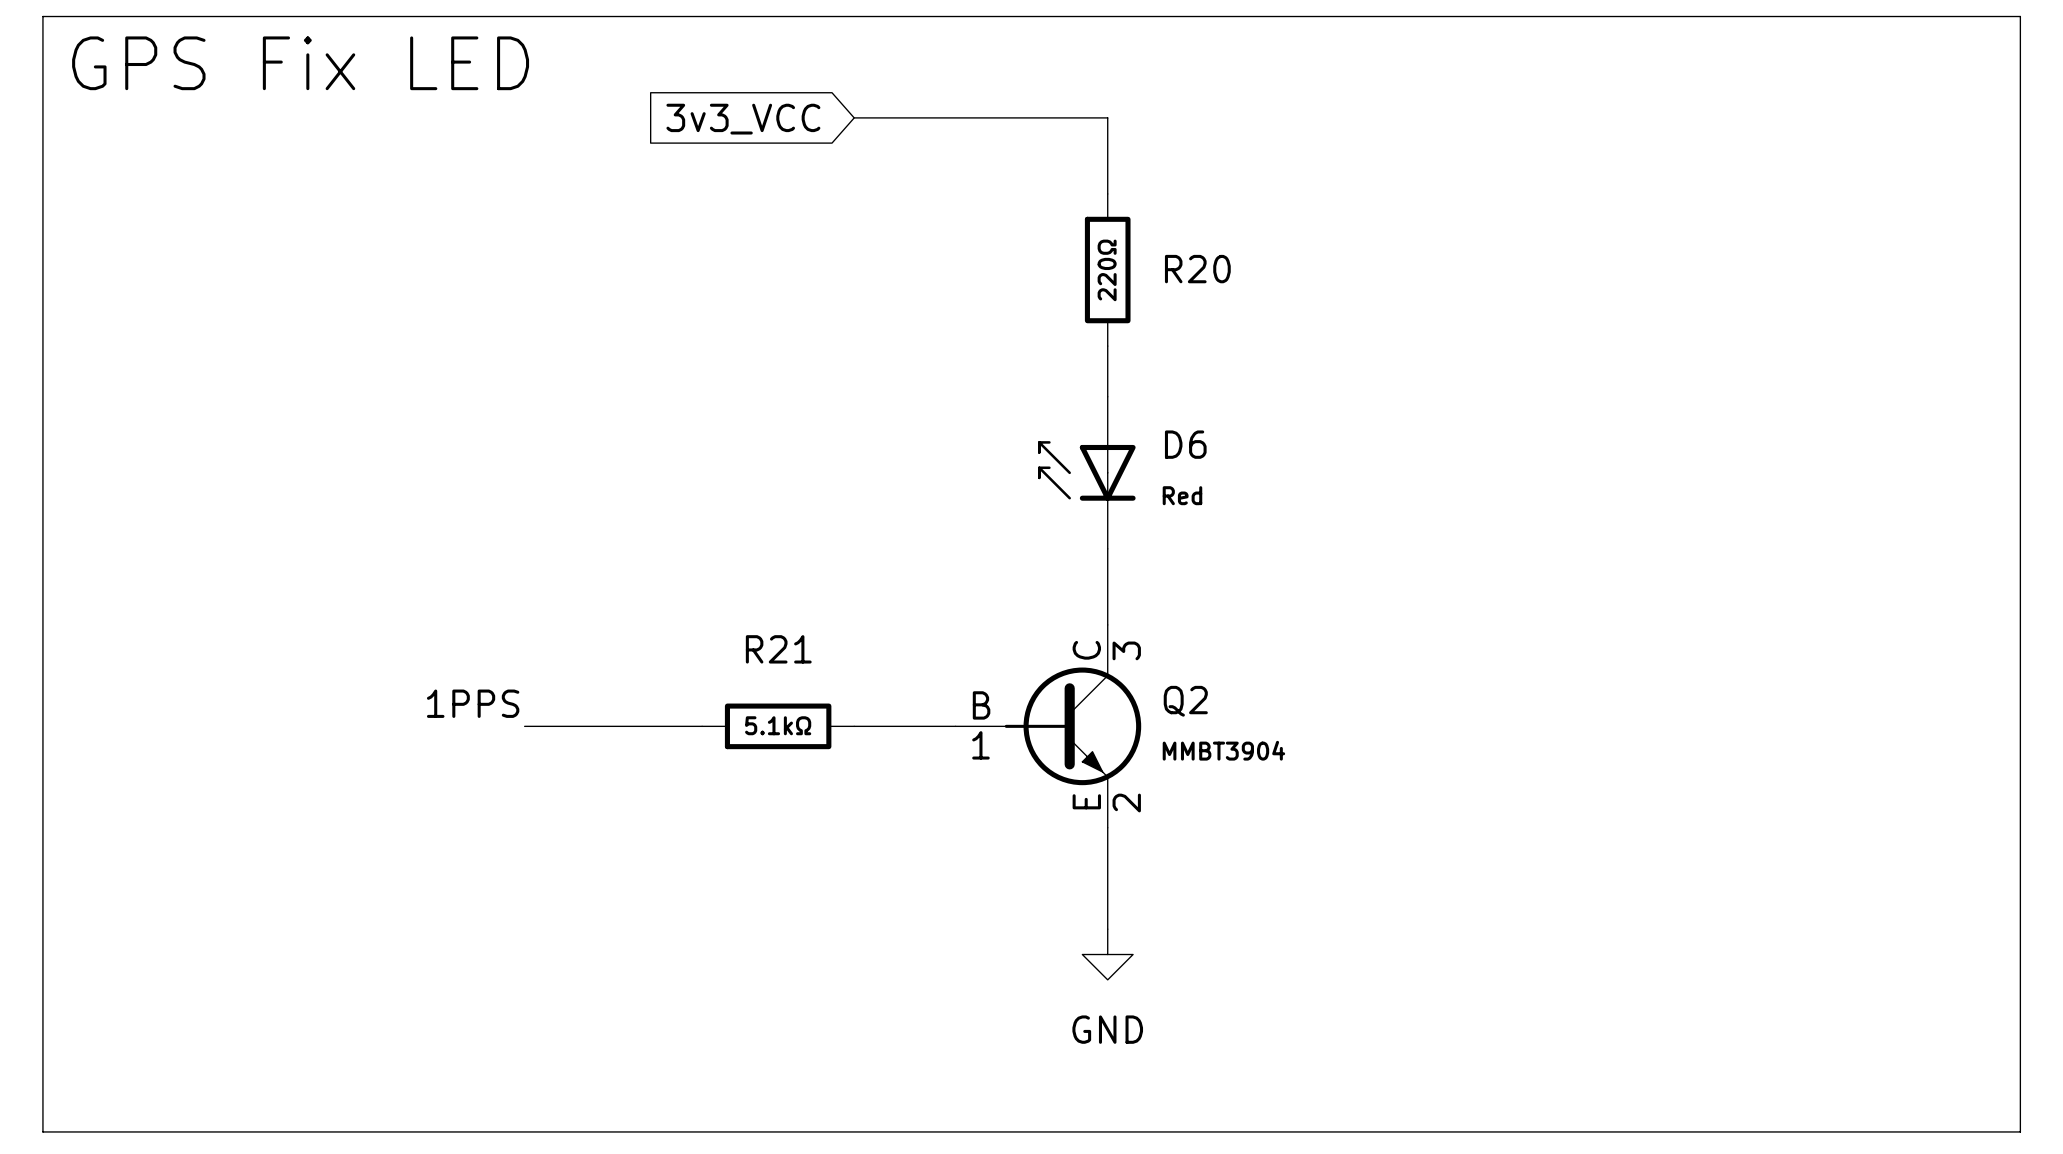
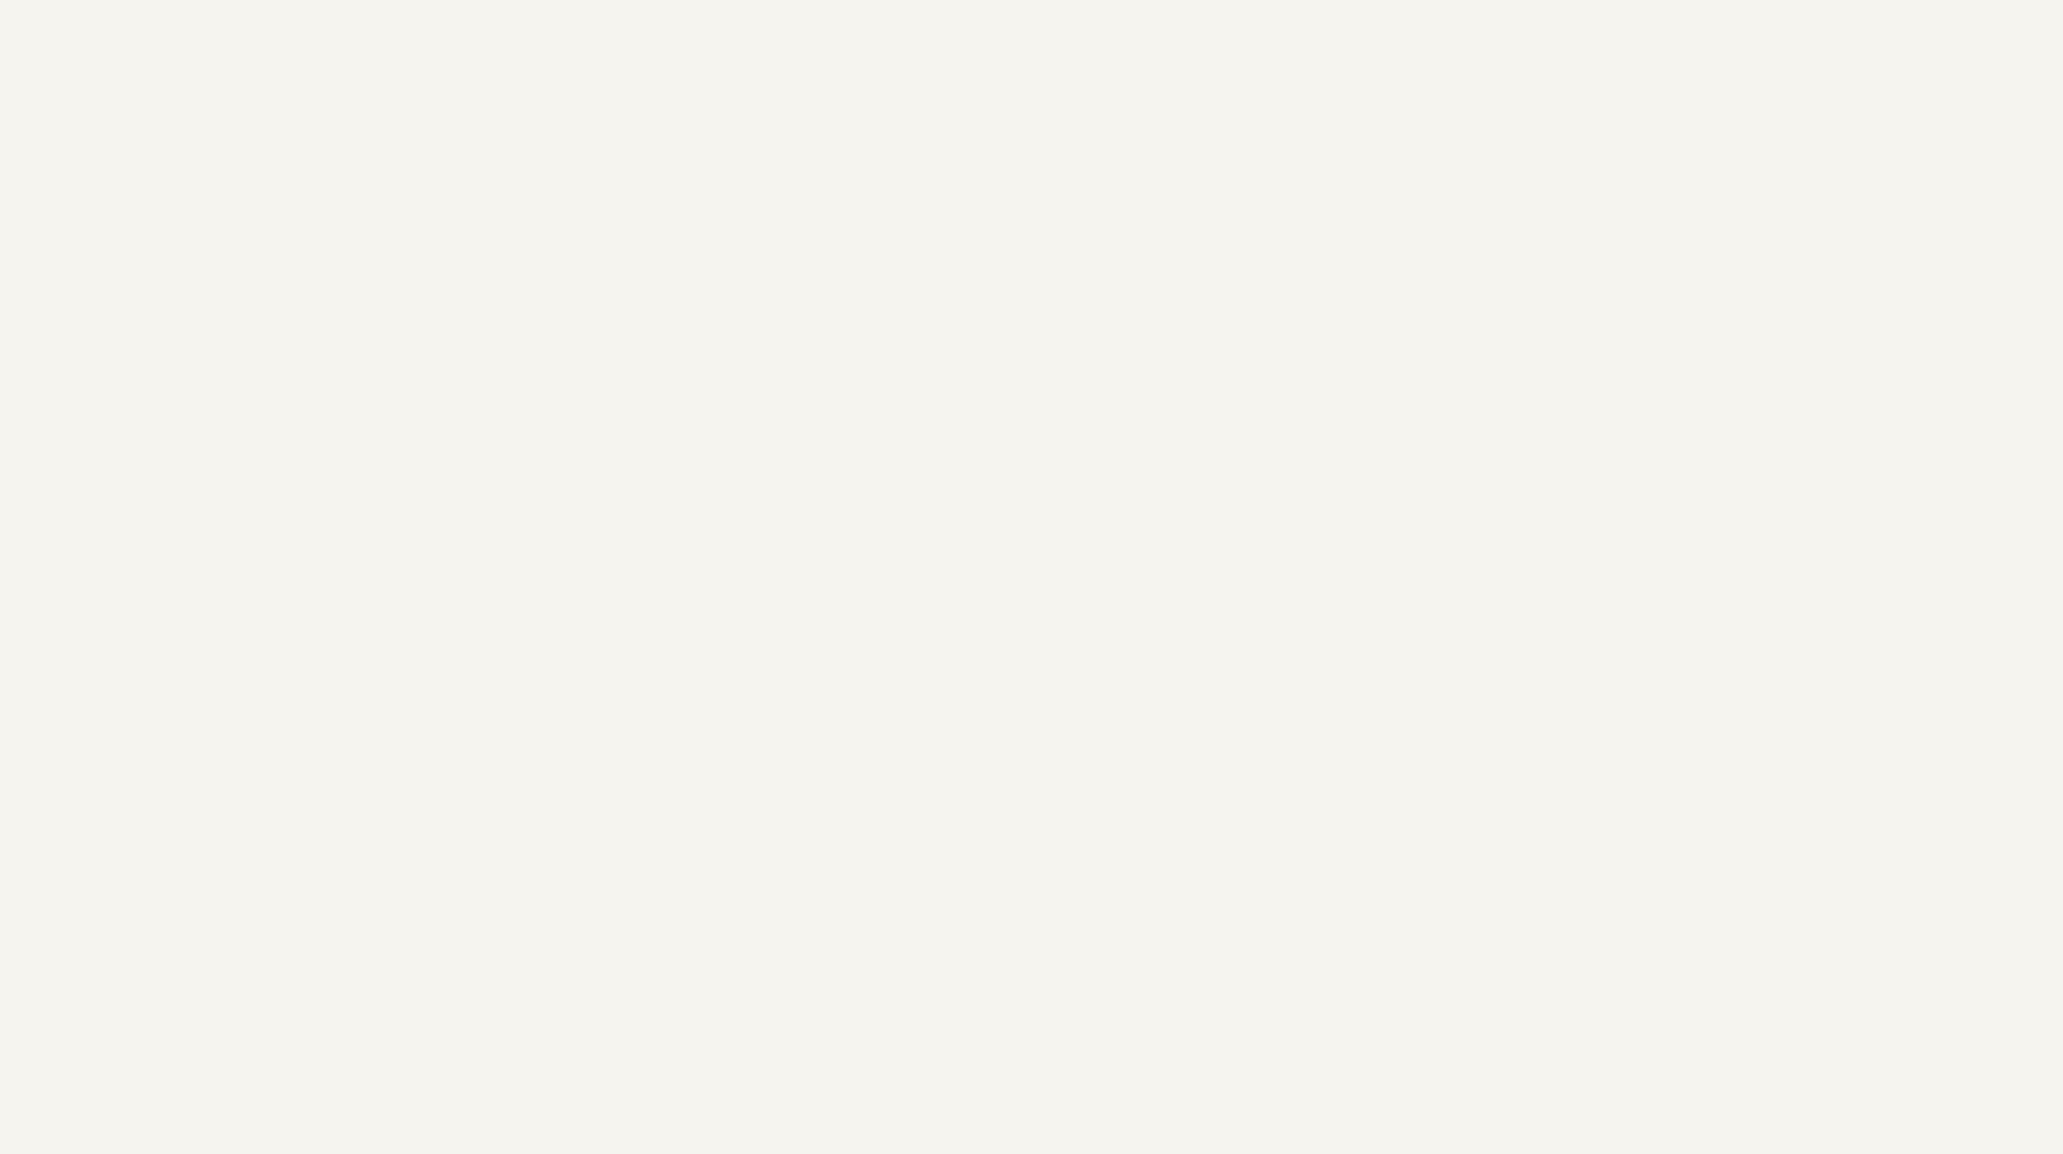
line: (42, 16) (2020, 16) (2020, 1131) (42, 1131) (42, 16) -> none
text: GPS Fix LED (300, 63) -> none
wire: (854, 117) (1107, 117) (1107, 193) -> none
global label: 3v3_VCC (743, 119) -> none
R20: 220Ω (1107, 270) -> none
wire: (1107, 346) (1107, 396) -> none
D6: Red (1086, 472) -> none
wire: (1107, 548) (1107, 624) -> none
label: 1PPS (473, 703) -> none
wire: (524, 726) (702, 726) -> none
R21: 5.1kΩ (778, 726) -> none
wire: (854, 726) (955, 726) -> none
Q2: MMBT3904 (1048, 726) -> none
wire: (1107, 827) (1107, 929) -> none
power symbol: GND (1107, 954) -> none

